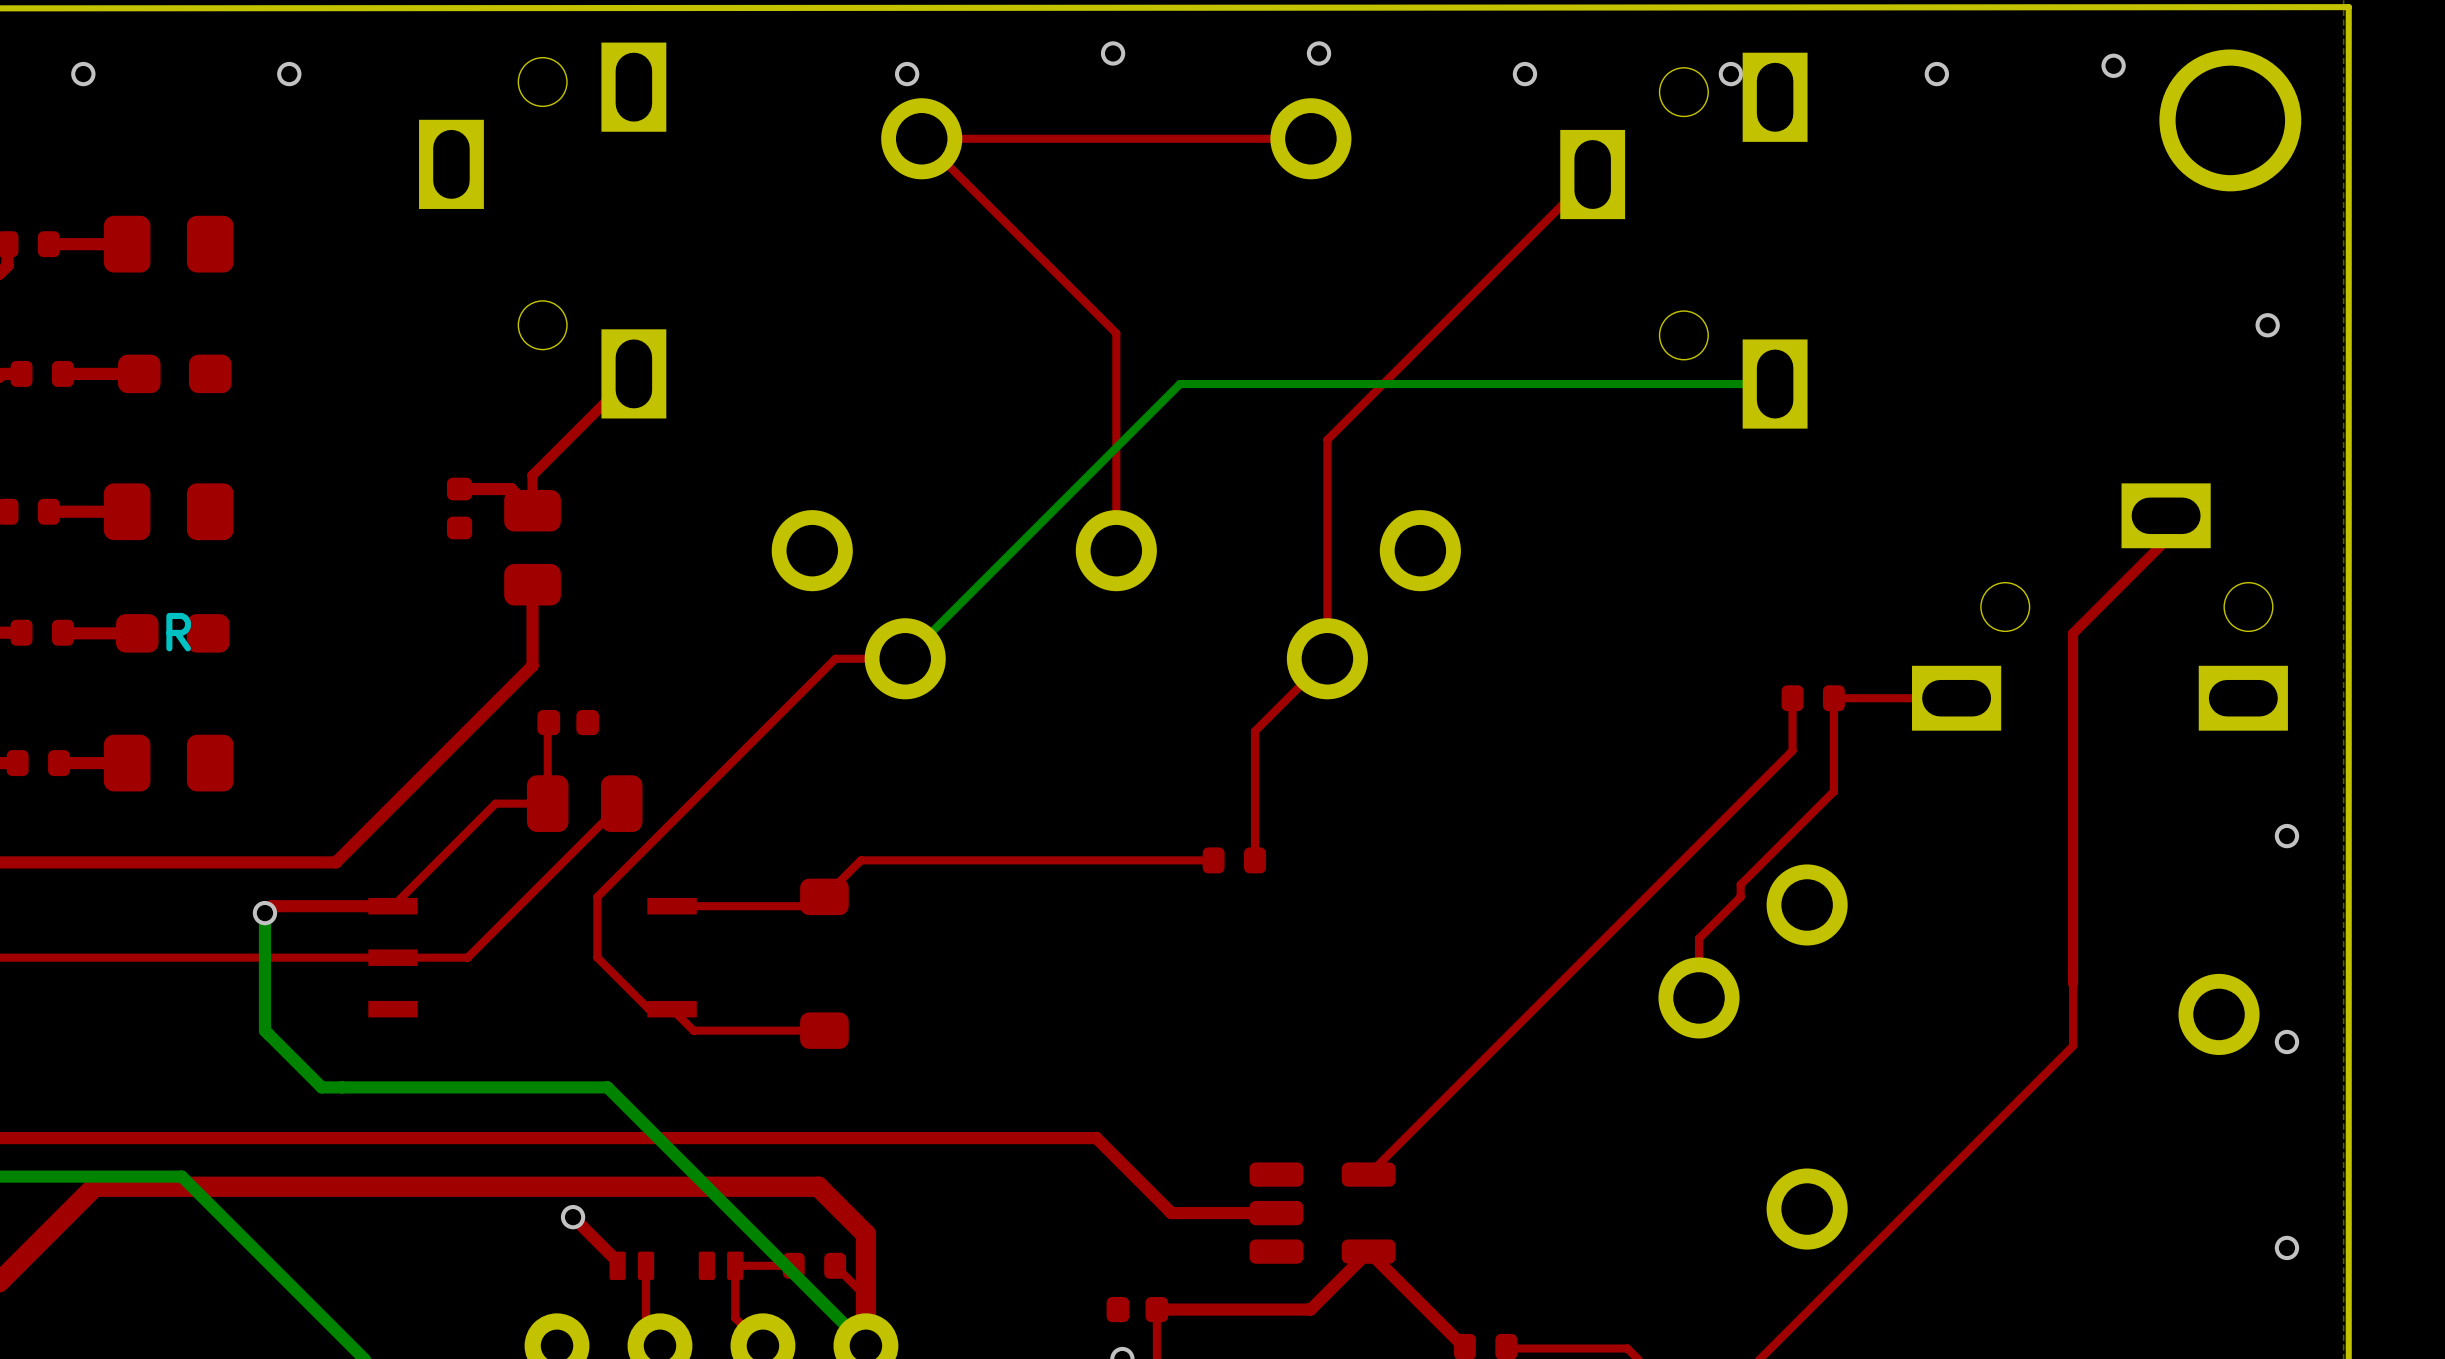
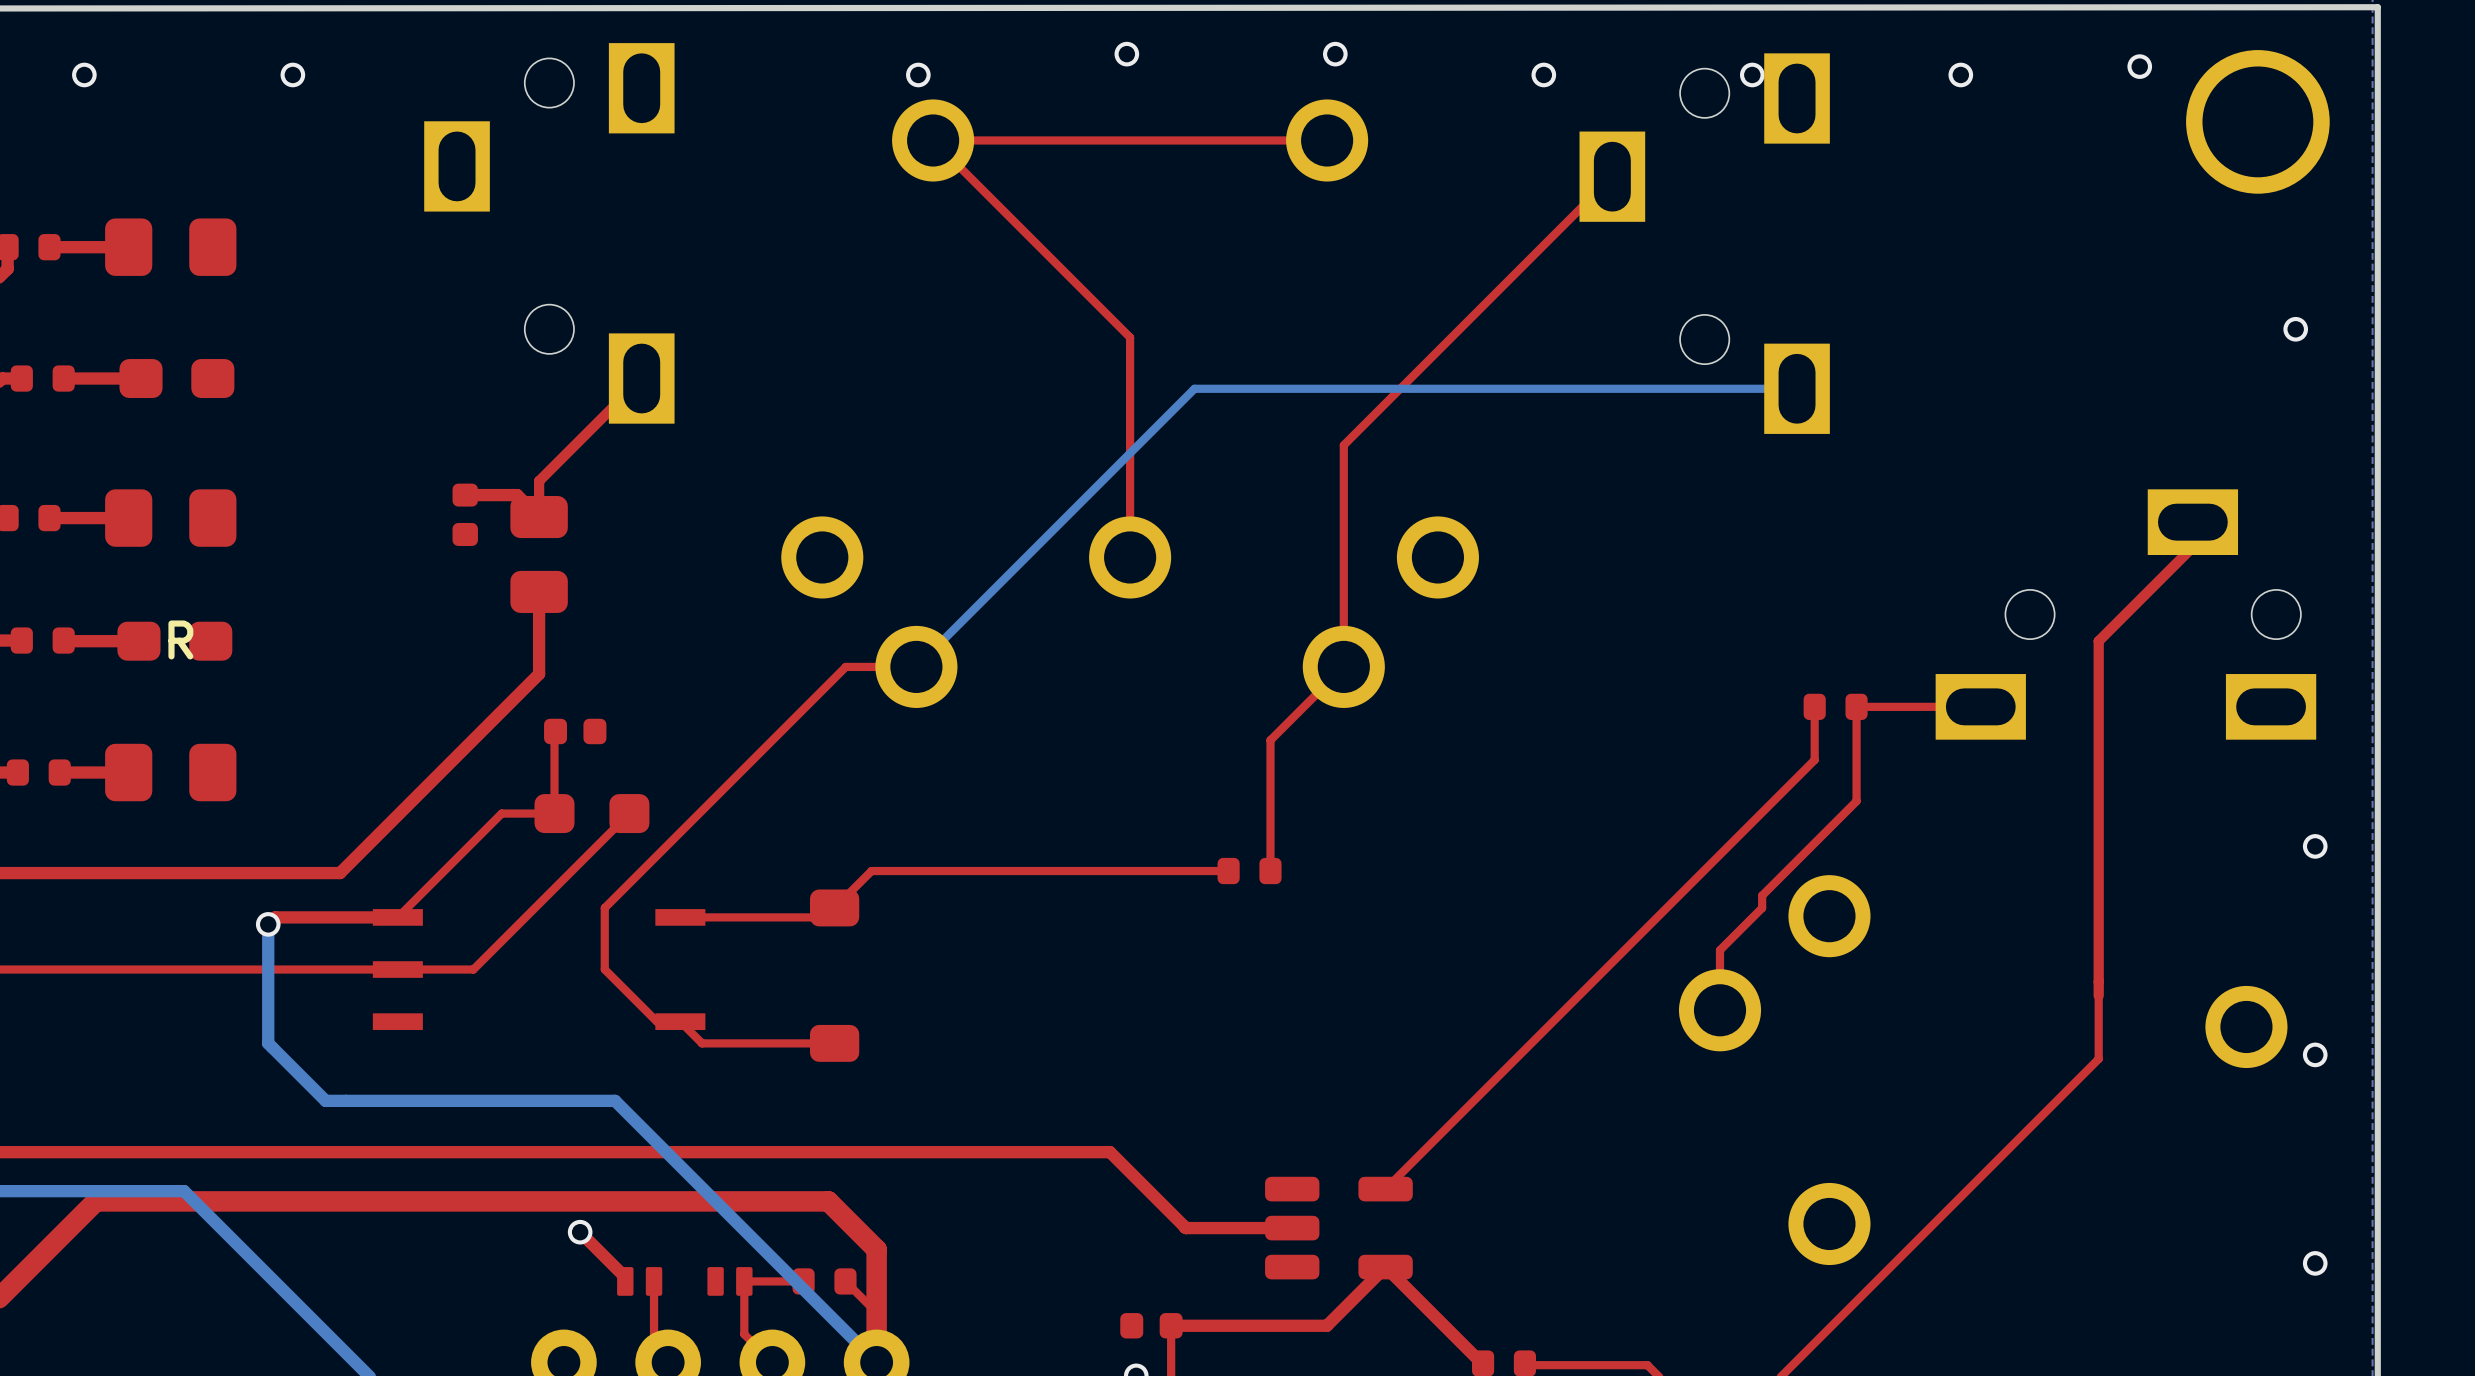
part footprint: [526, 775, 643, 833] -> [534, 794, 650, 834]

